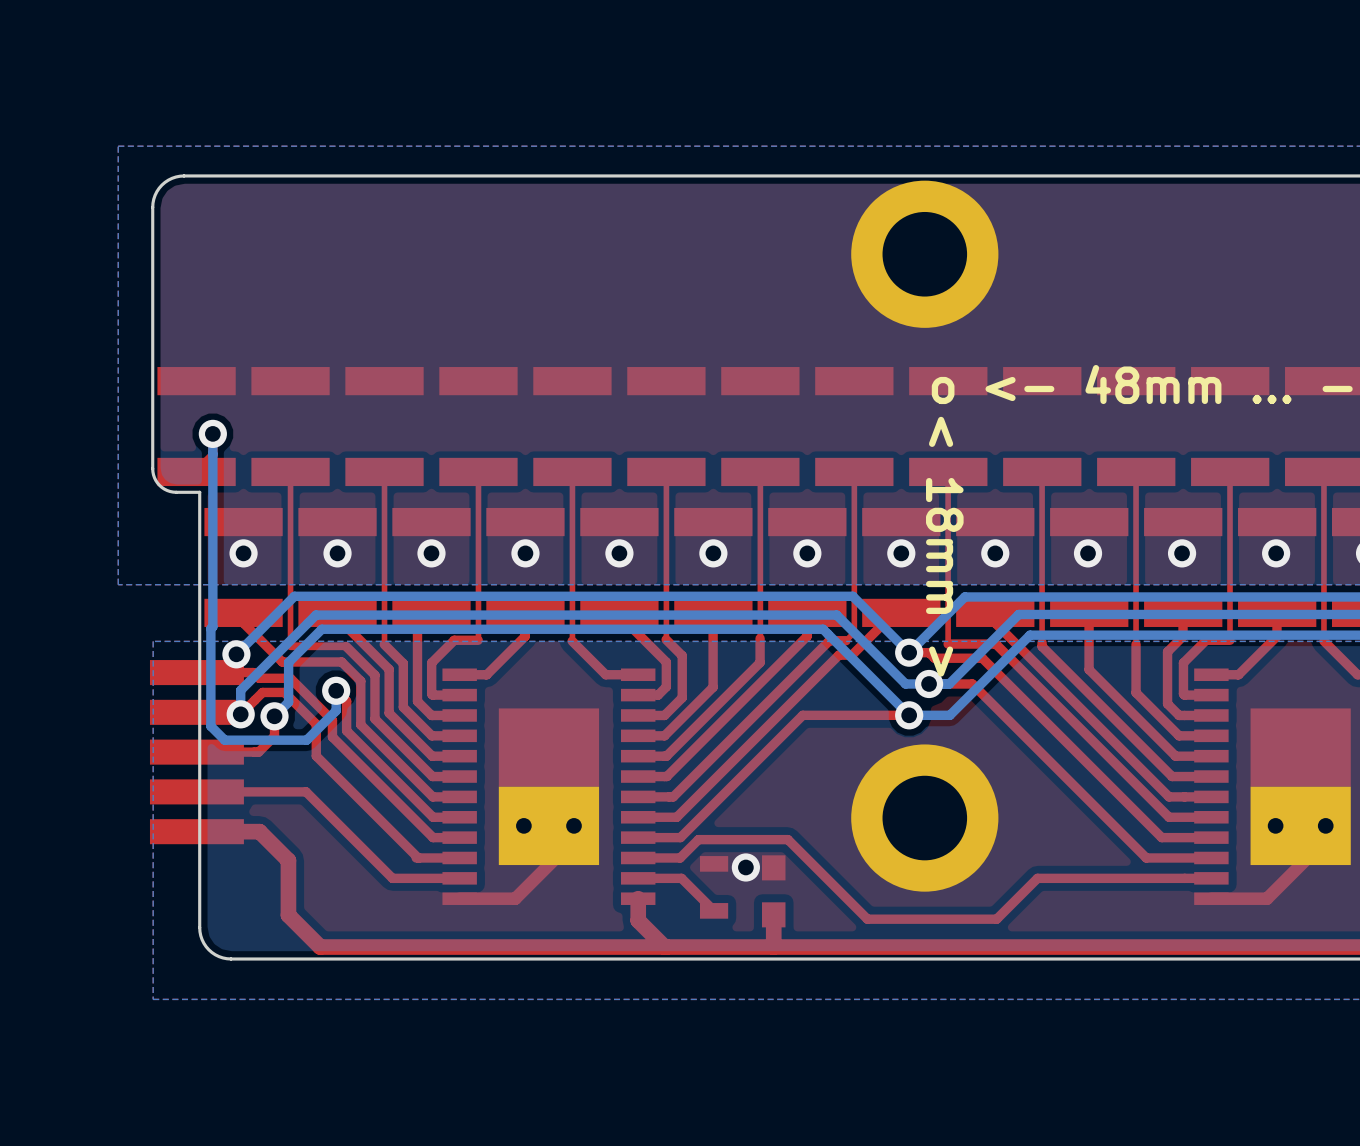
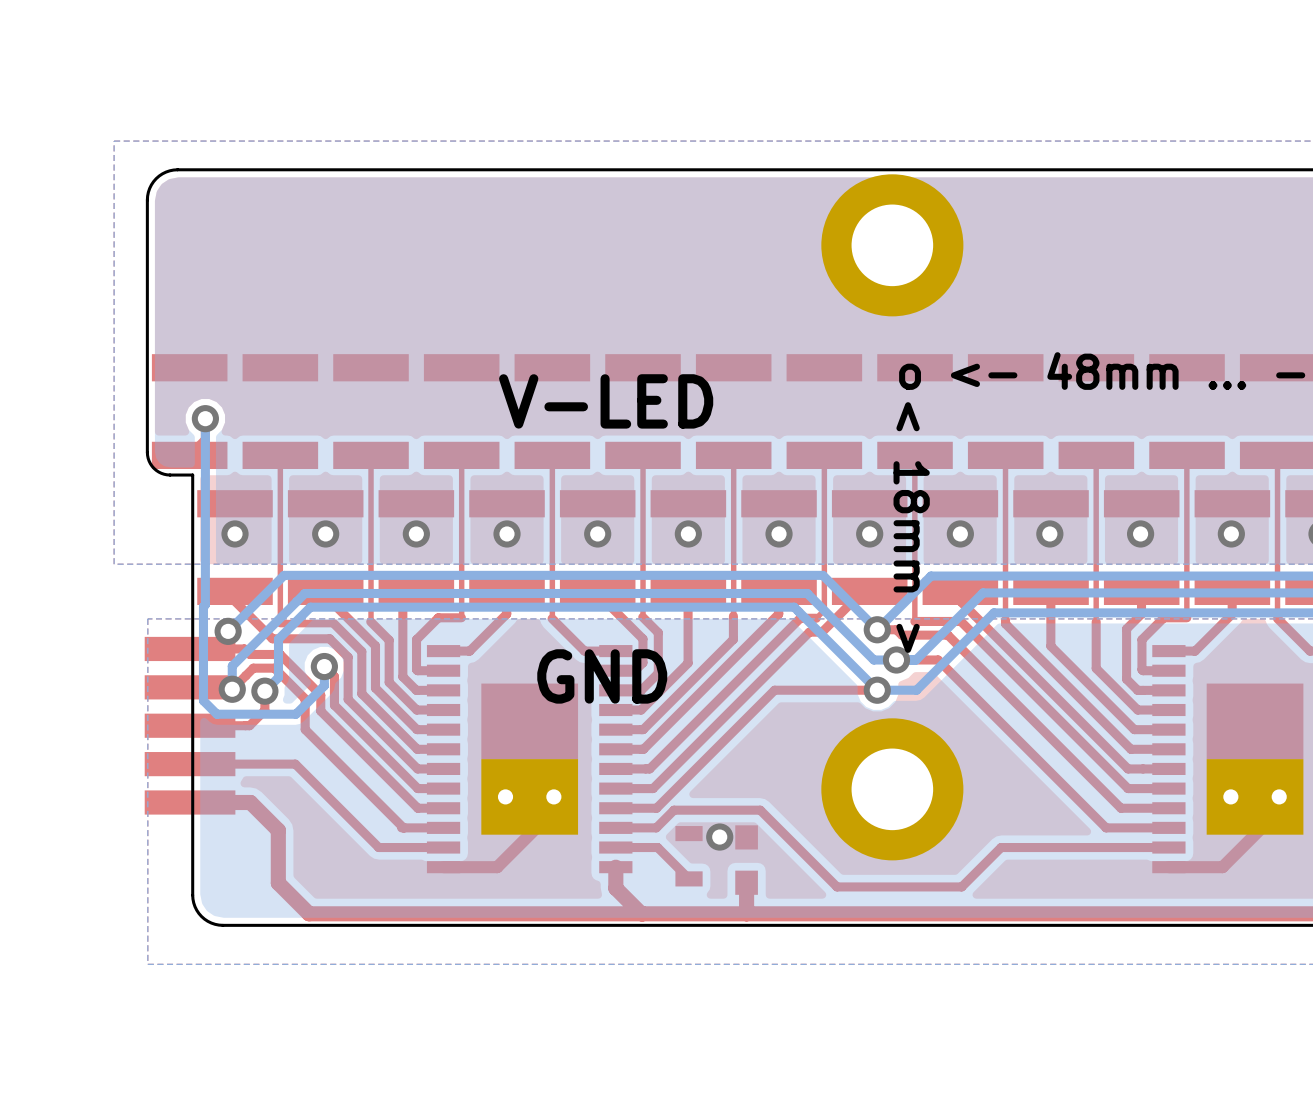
text: none -> V-LED (606, 401)
text: none -> GND (602, 676)

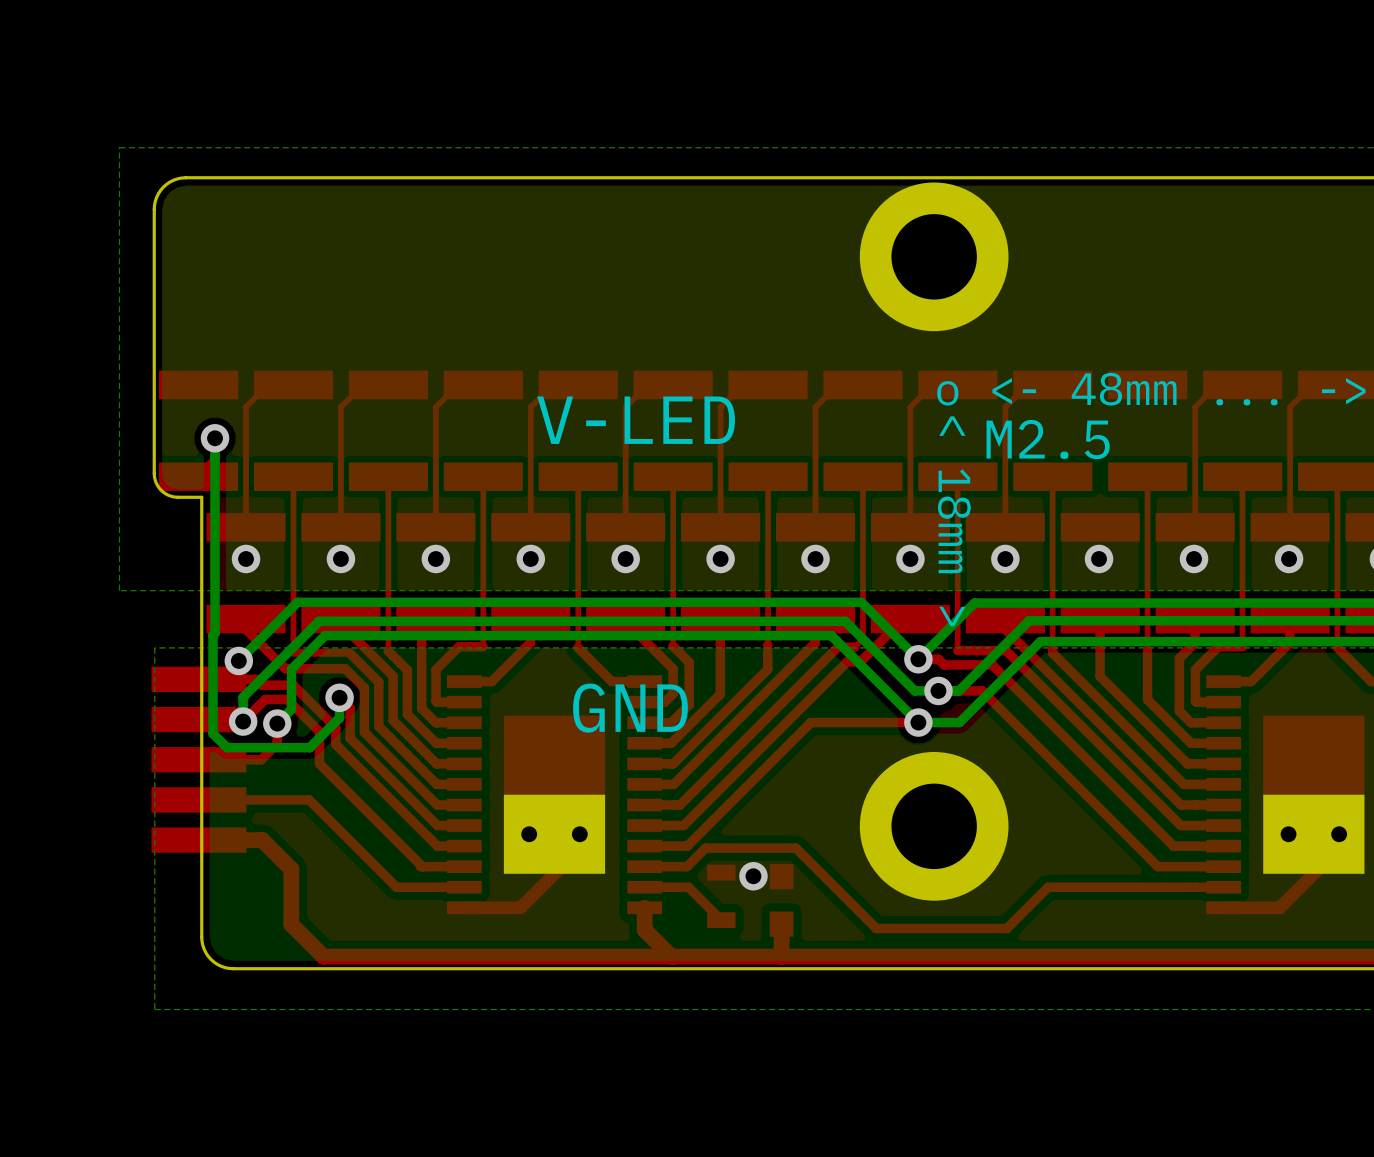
top track: none -> (293, 384) (268, 384) (246, 407) (246, 527)
top track: none -> (388, 384) (363, 384) (340, 407) (340, 527)
top track: none -> (483, 384) (458, 384) (435, 407) (435, 527)
top track: none -> (578, 384) (552, 384) (530, 407) (530, 527)
top track: none -> (673, 384) (647, 384) (625, 407) (625, 527)
top track: none -> (768, 384) (742, 384) (720, 407) (720, 527)
top track: none -> (862, 384) (837, 384) (815, 407) (815, 527)
top track: none -> (957, 384) (932, 384) (910, 407) (910, 527)
top track: none -> (1052, 384) (1027, 384) (1005, 407) (1005, 527)
top track: none -> (1242, 384) (1217, 384) (1195, 407) (1195, 527)
top track: none -> (1337, 384) (1312, 384) (1290, 407) (1290, 527)
text: none -> M2.5 (1048, 439)

